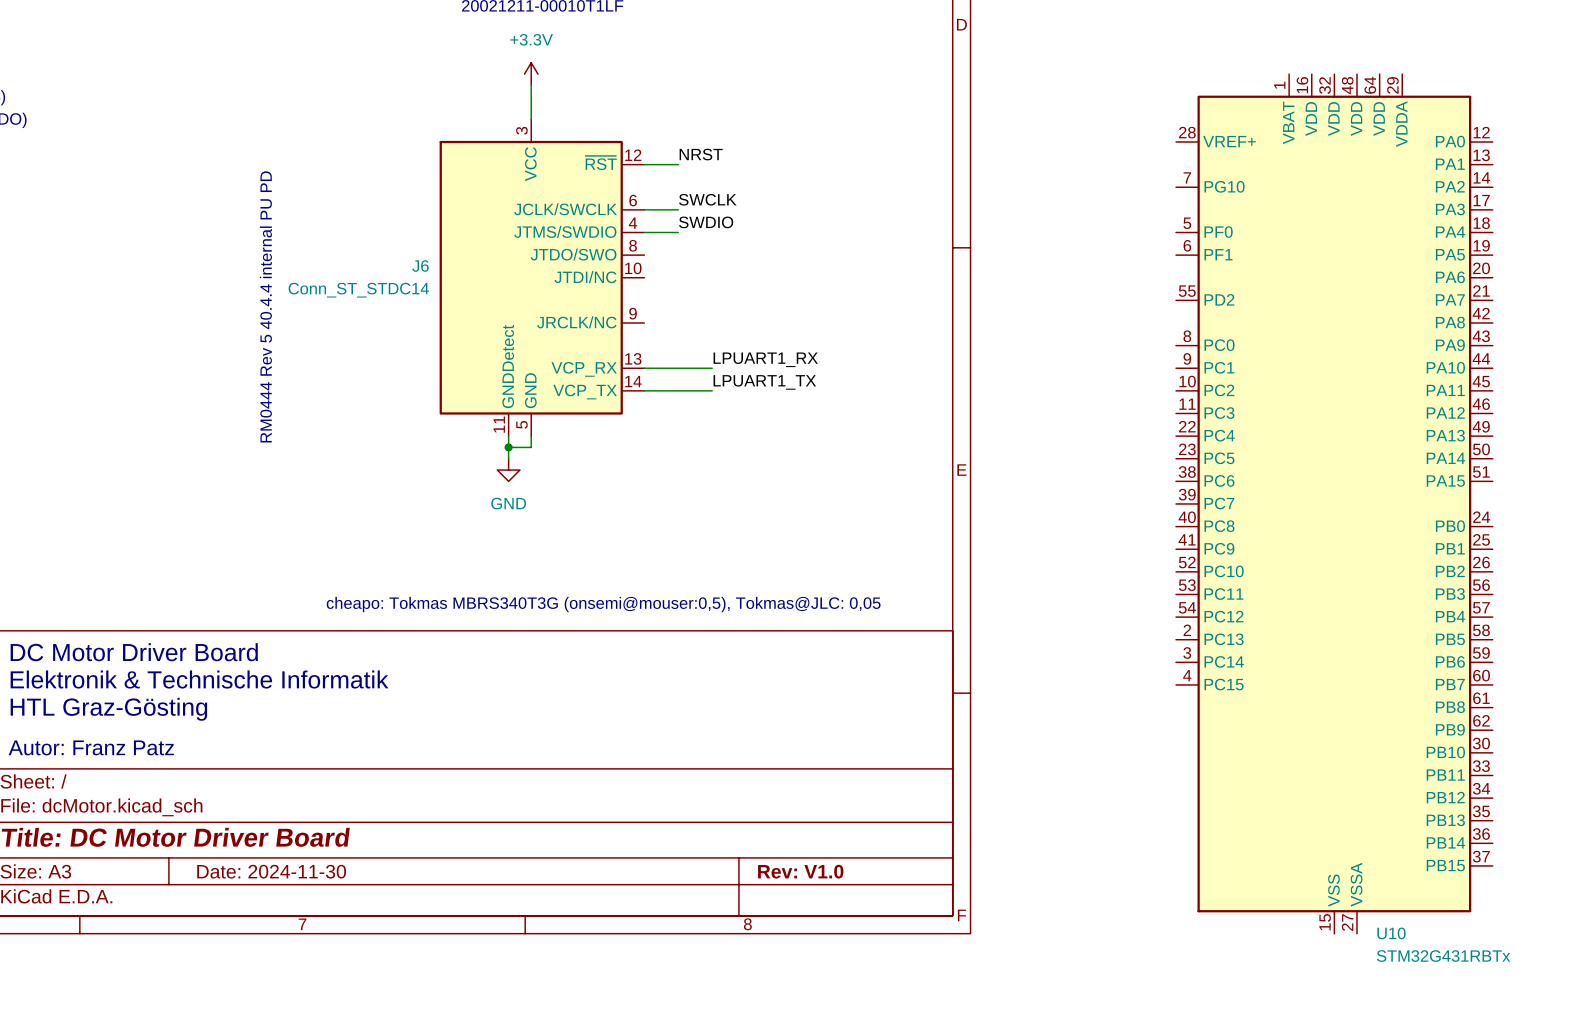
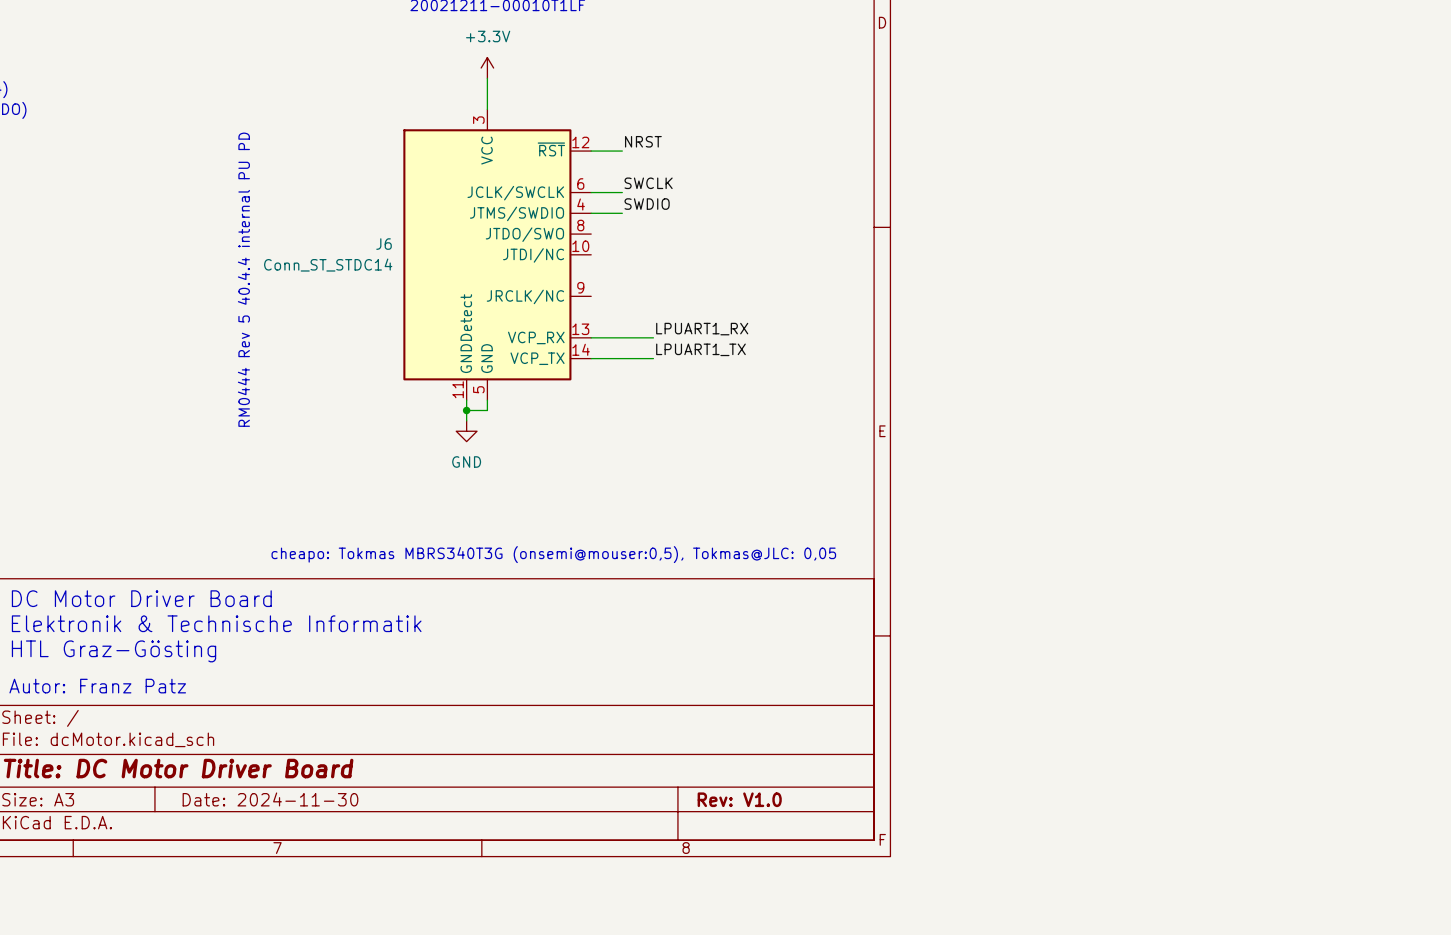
U10: STM32G431RBTx (1334, 503) -> none

